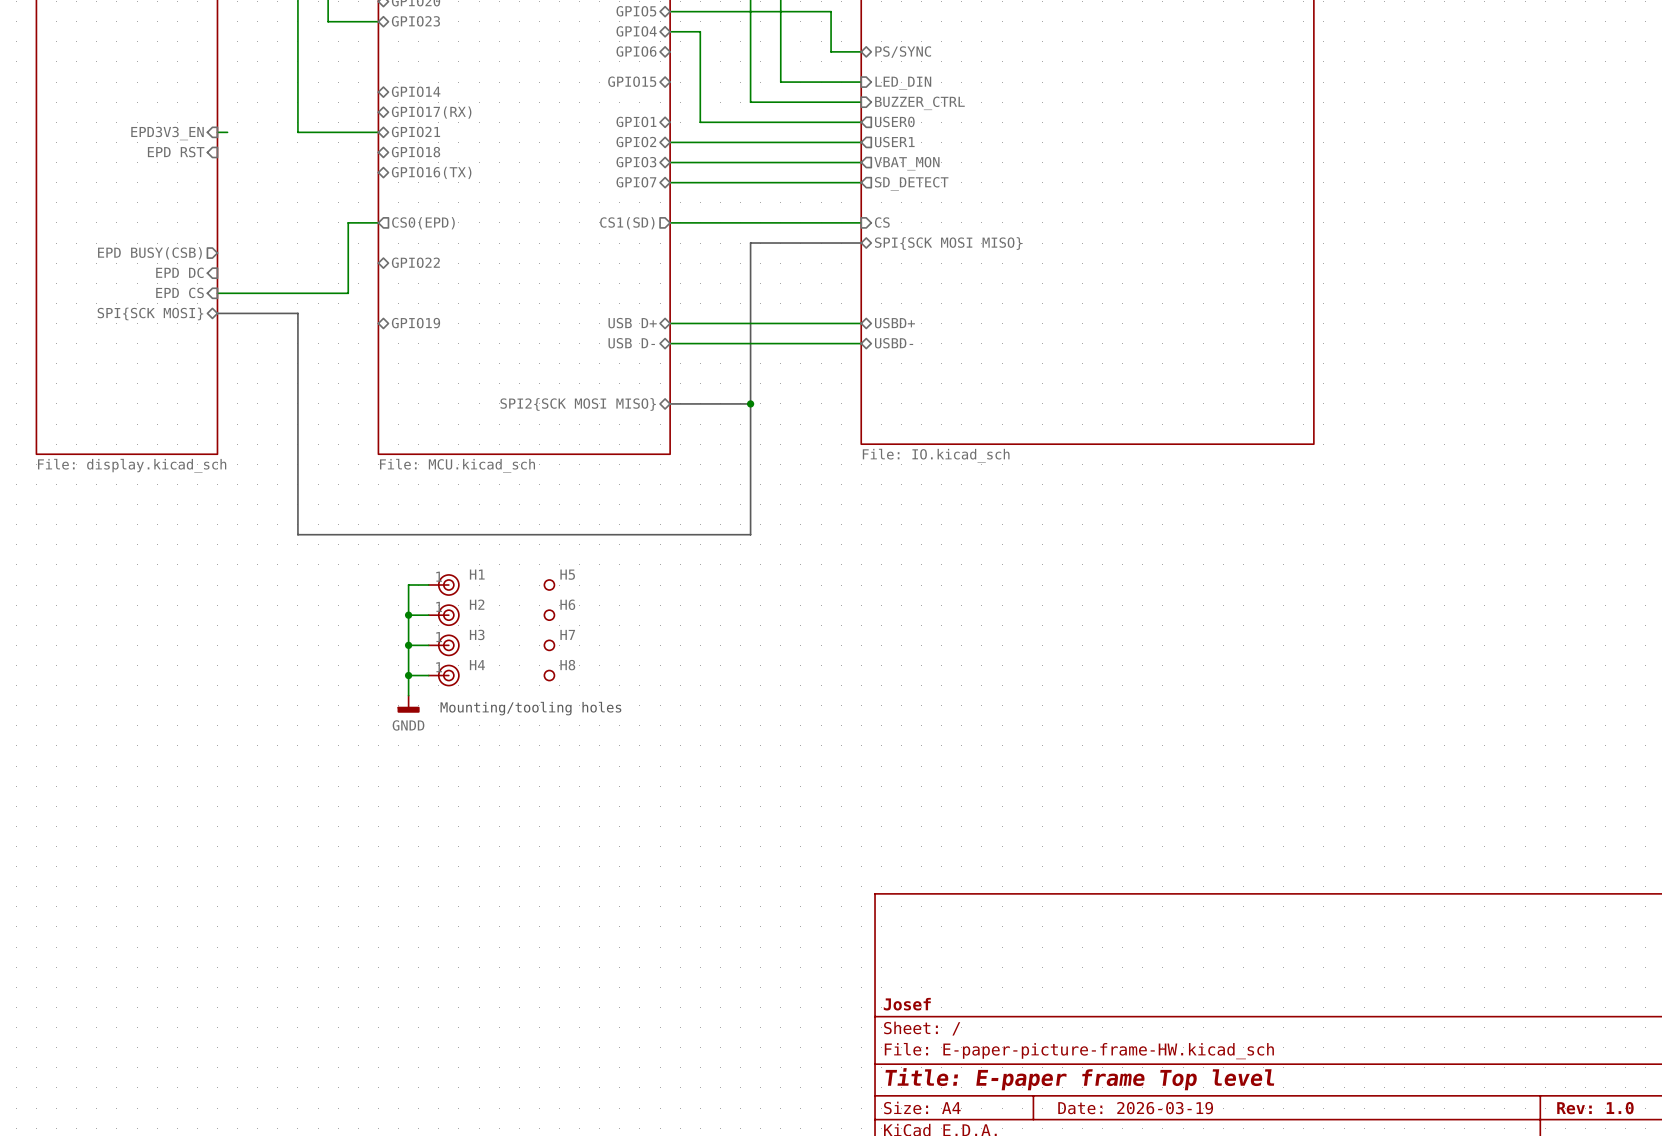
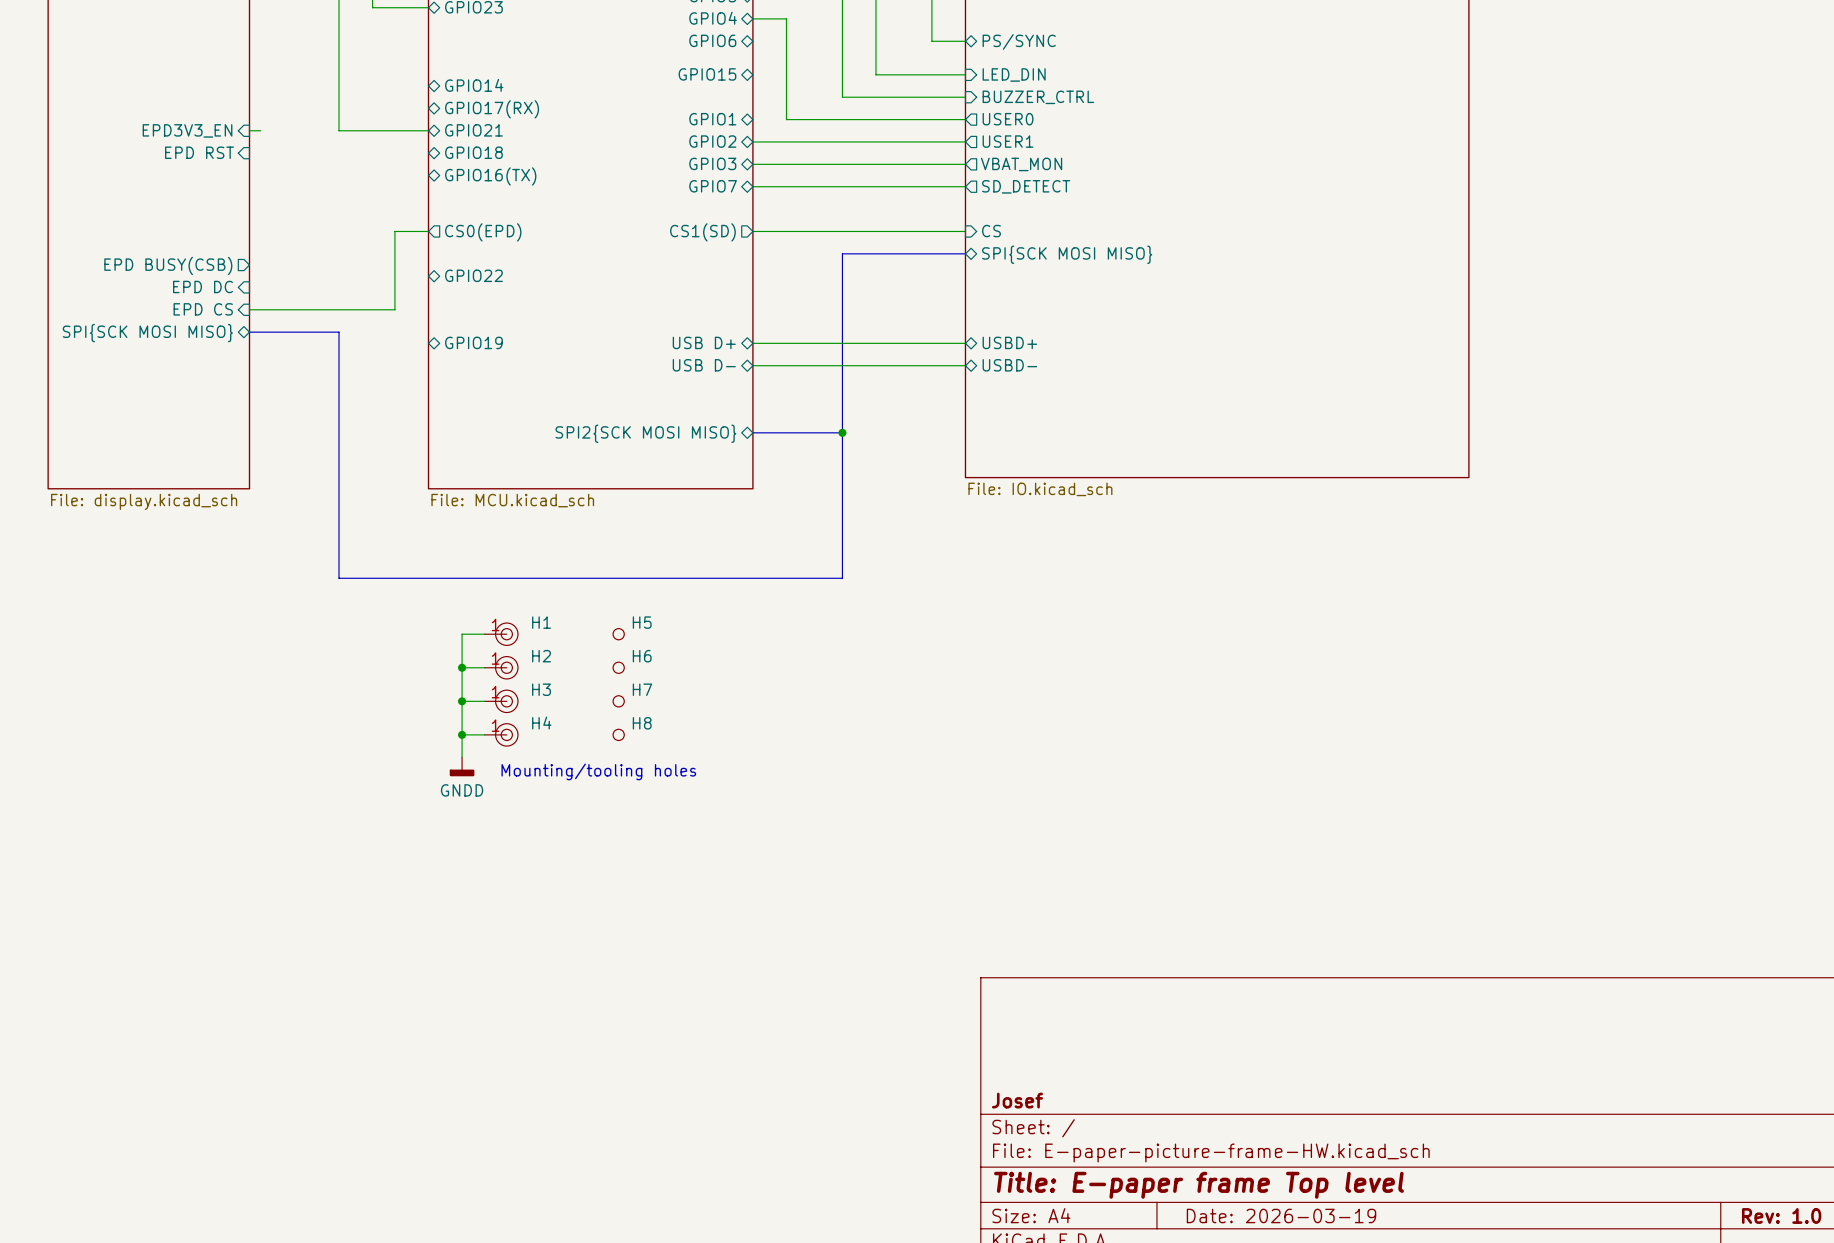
sheet pin: SPI{SCK MOSI} (150, 313) -> SPI{SCK MOSI MISO} (147, 333)

